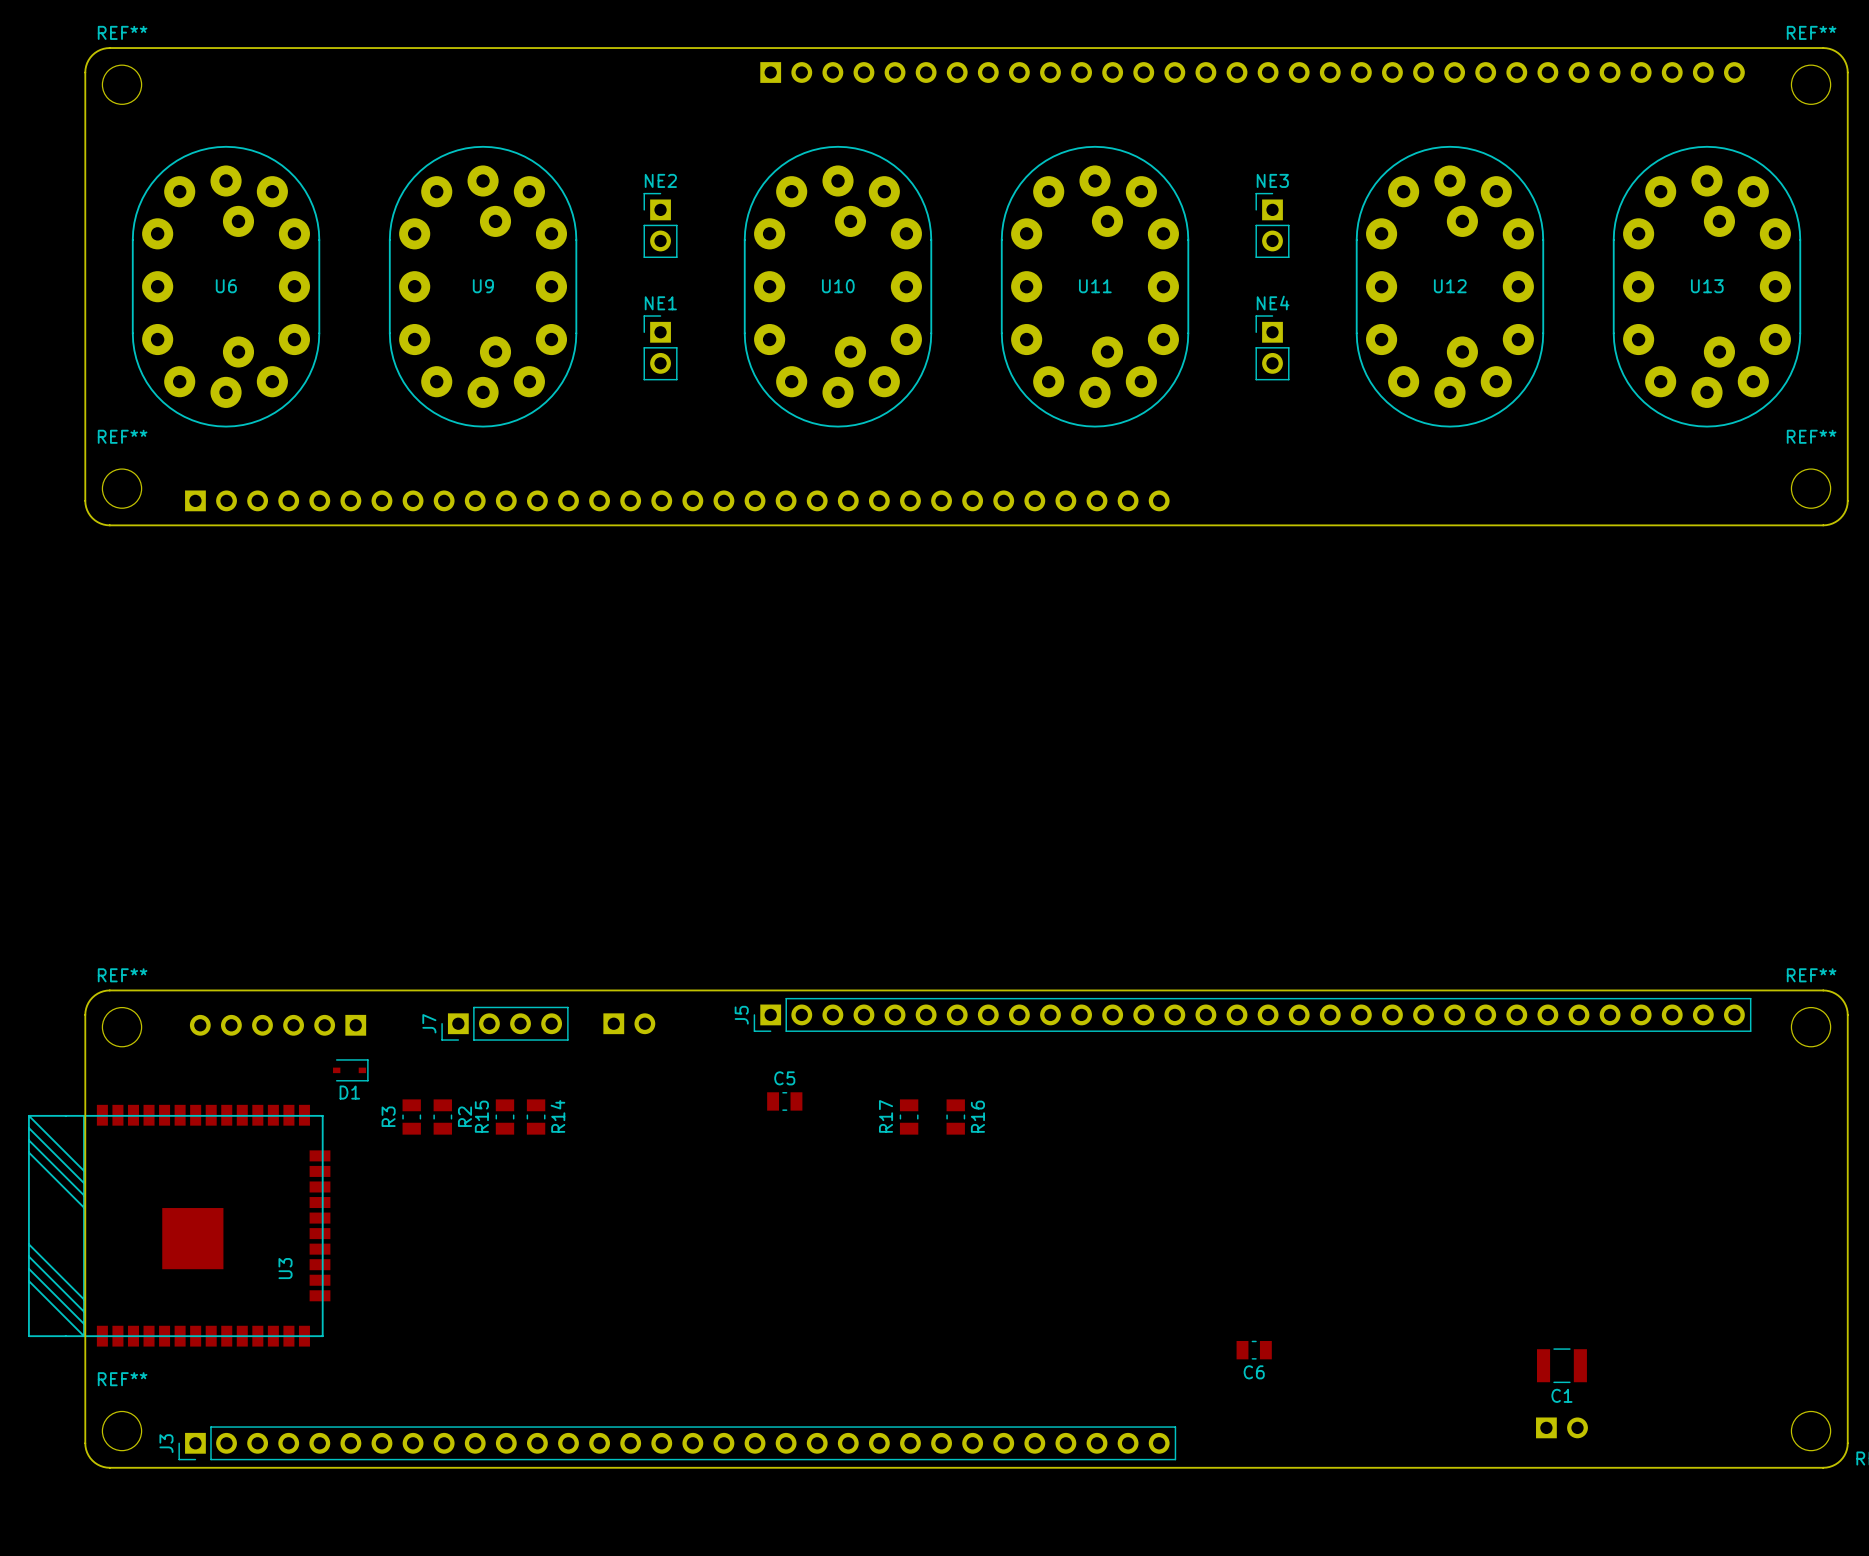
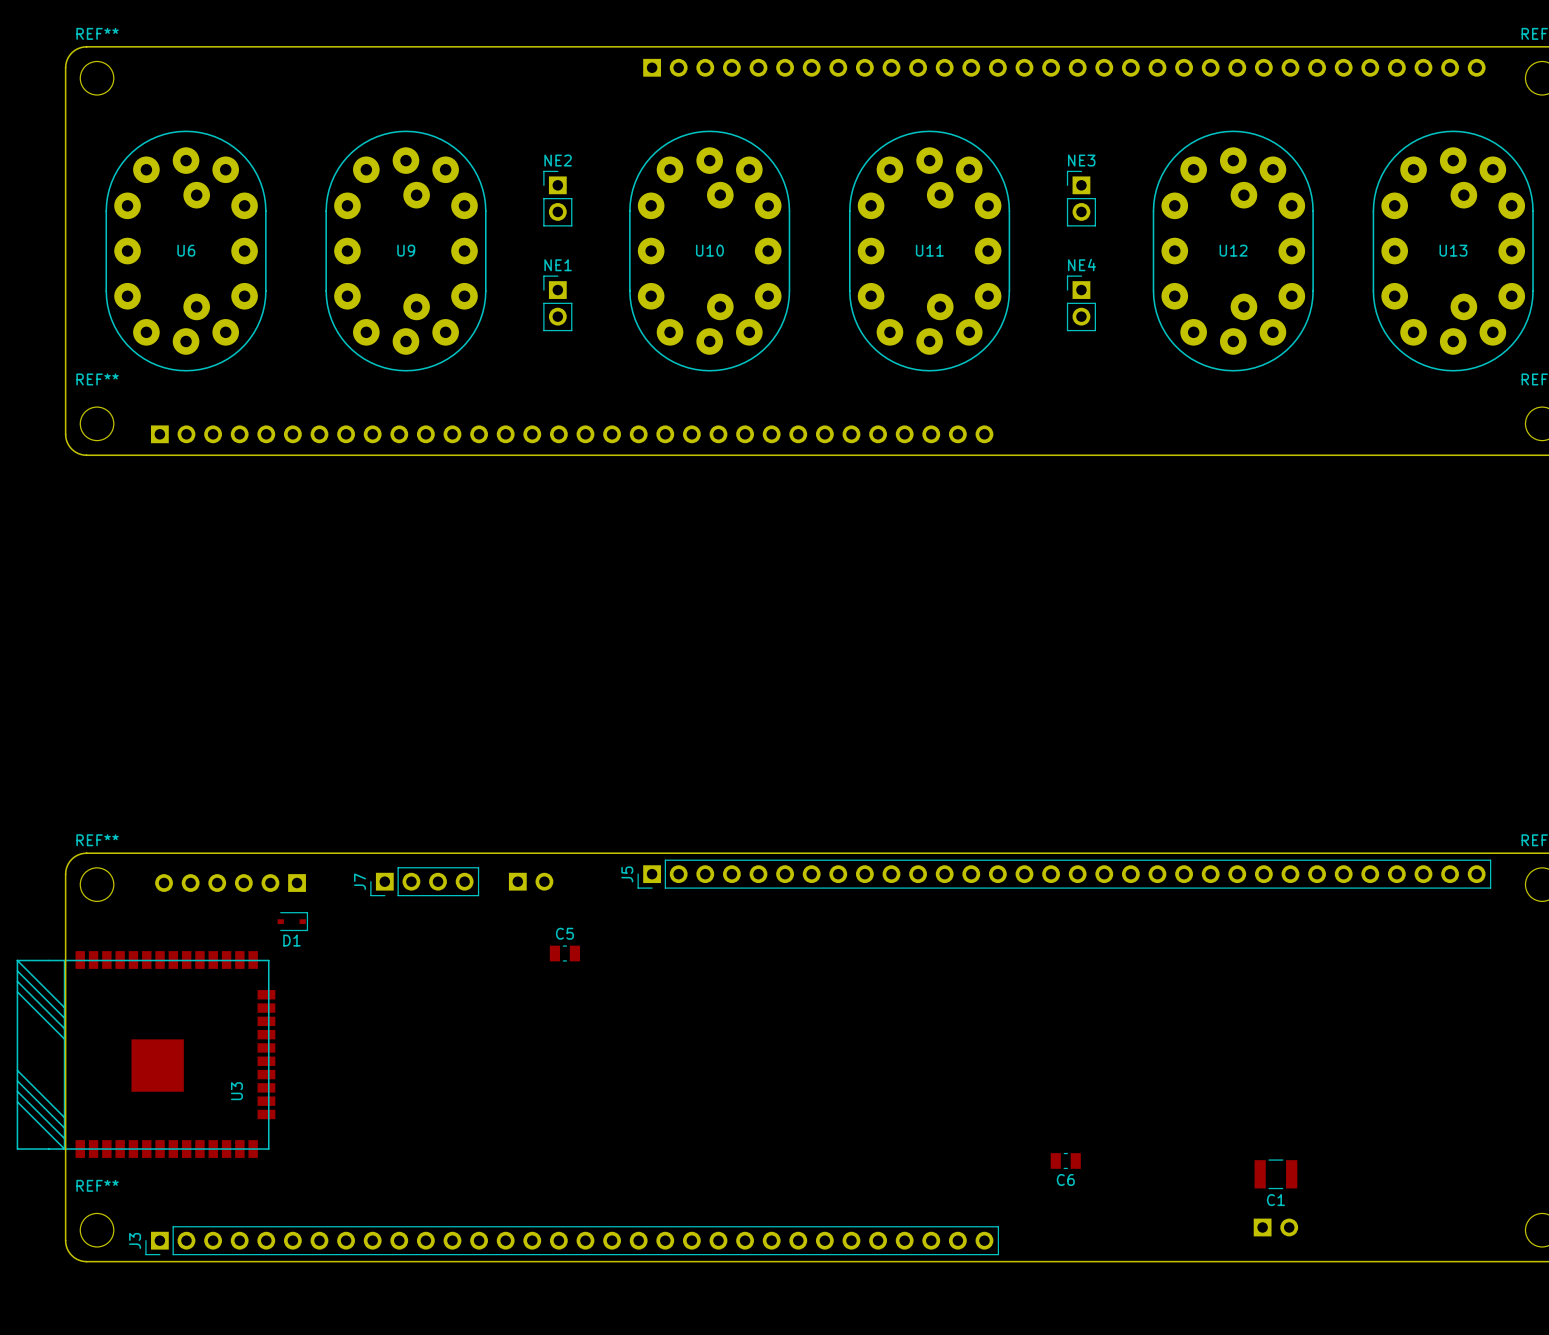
C5 position: (784, 1101) -> (564, 953)
R3: (411, 1117) -> none
R2: (442, 1117) -> none
R15: (504, 1117) -> none
R14: (536, 1117) -> none
R17: (909, 1117) -> none
R16: (955, 1117) -> none
C1 position: (1561, 1365) -> (1275, 1174)
part position: (1561, 1427) -> (1275, 1227)

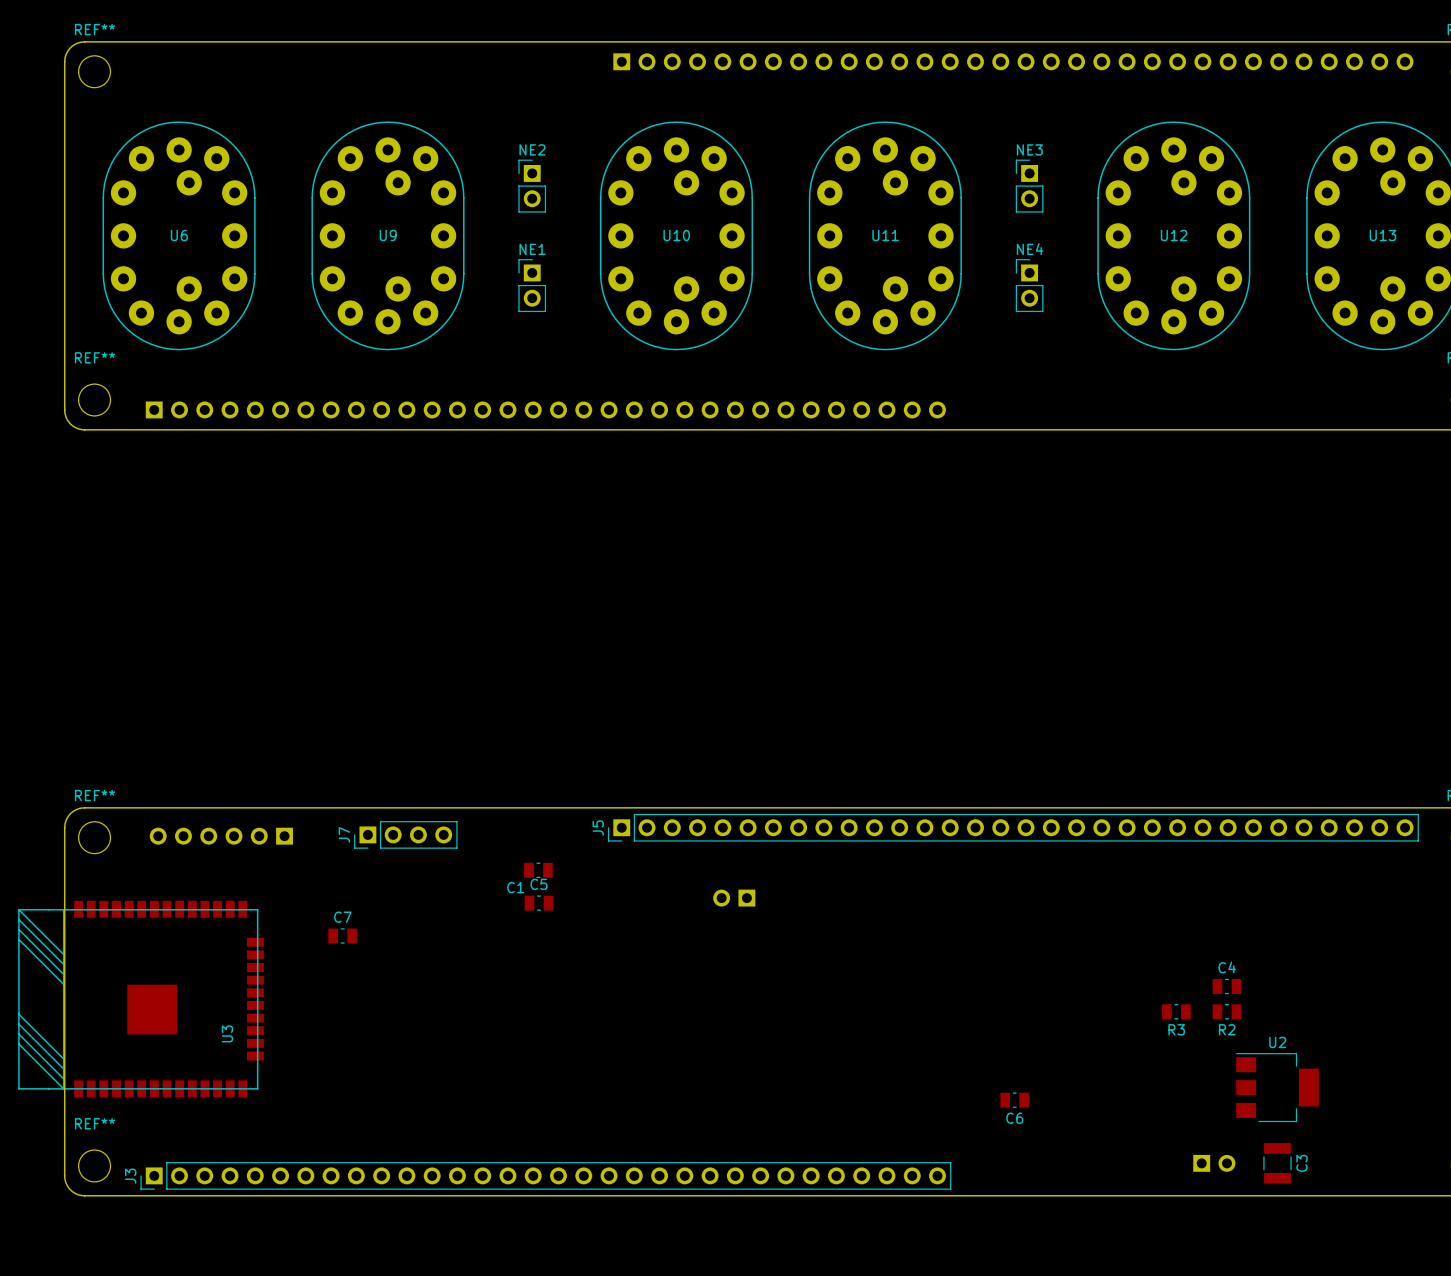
part rotation: 0° (531, 881) -> 180° (734, 898)
part position: (531, 881) -> (734, 898)
D1: (292, 921) -> none
C7: none -> (342, 935)
C4: none -> (1226, 986)
R3: none -> (1176, 1011)
R2: none -> (1226, 1011)
U2: none -> (1277, 1087)
C1 footprint: [1254, 1159, 1298, 1190] -> [524, 862, 553, 878]
C1 name position: C1 (1275, 1200) -> C1 (515, 887)
C3: none -> (1277, 1163)

